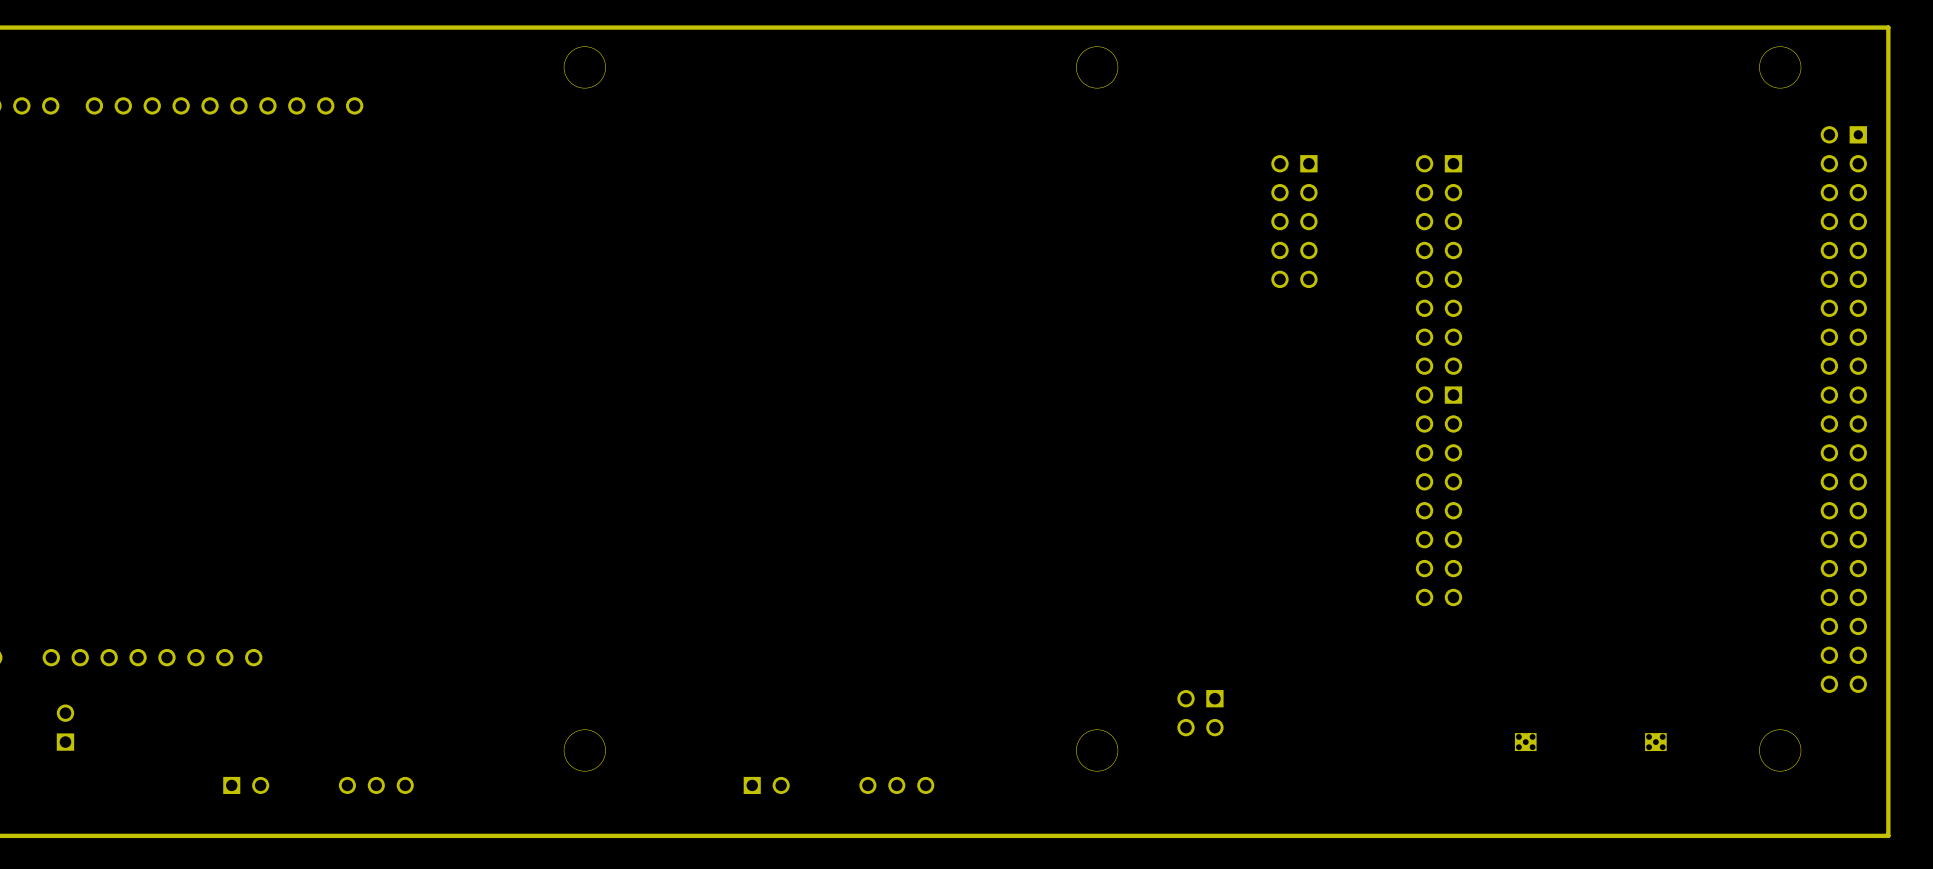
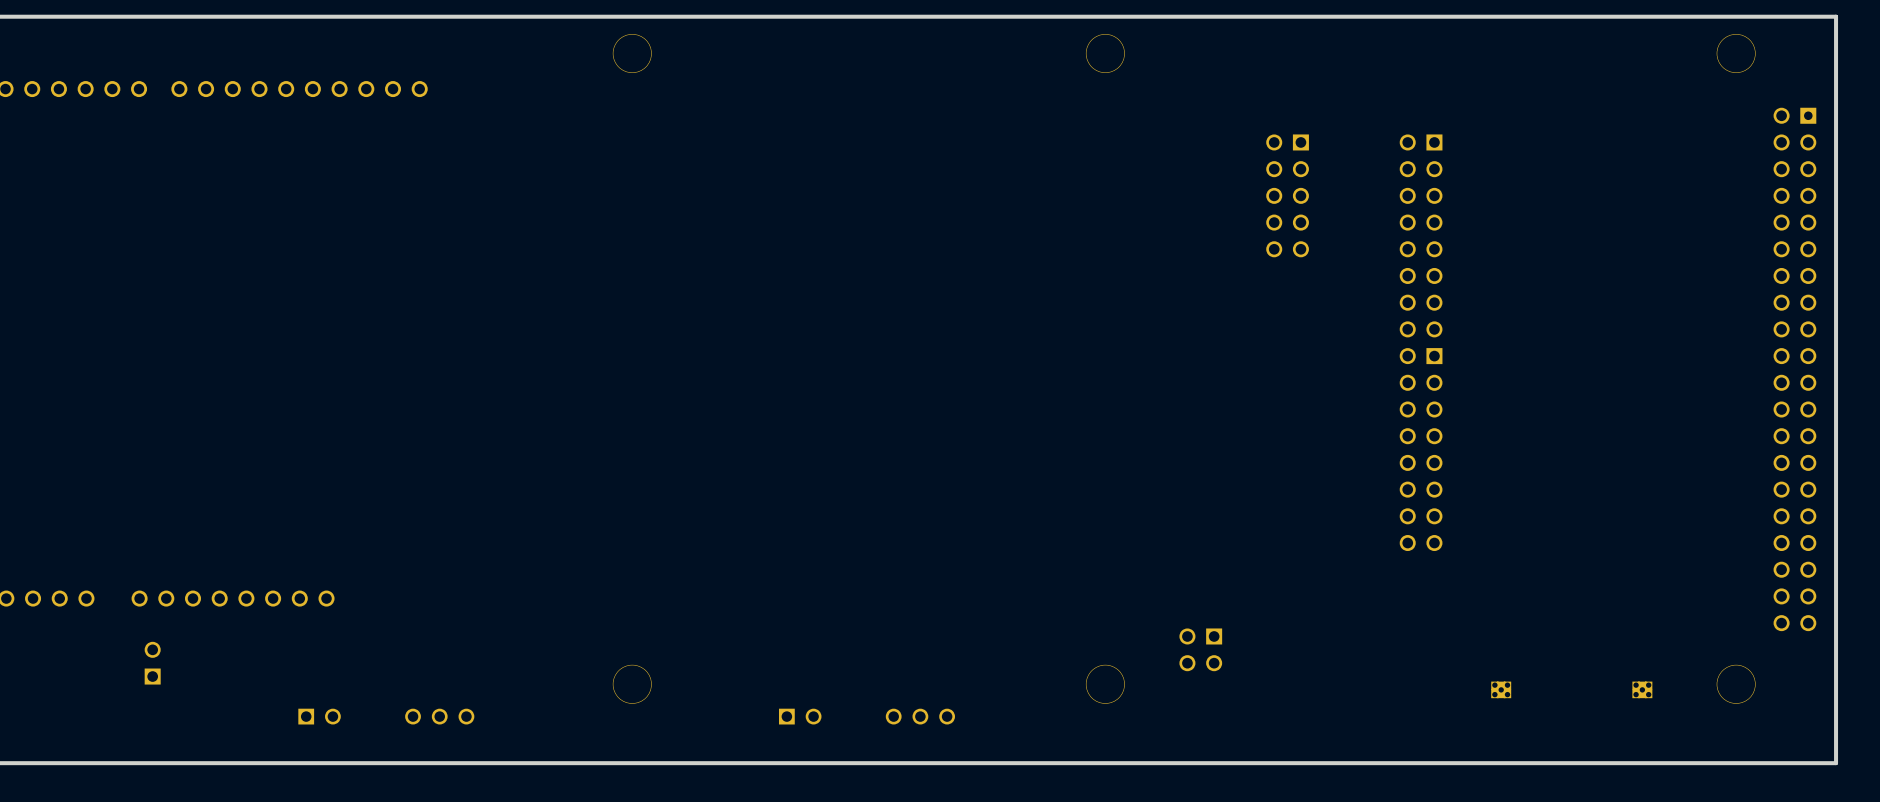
part position: (1525, 742) -> (1501, 689)
part position: (1655, 742) -> (1642, 689)

